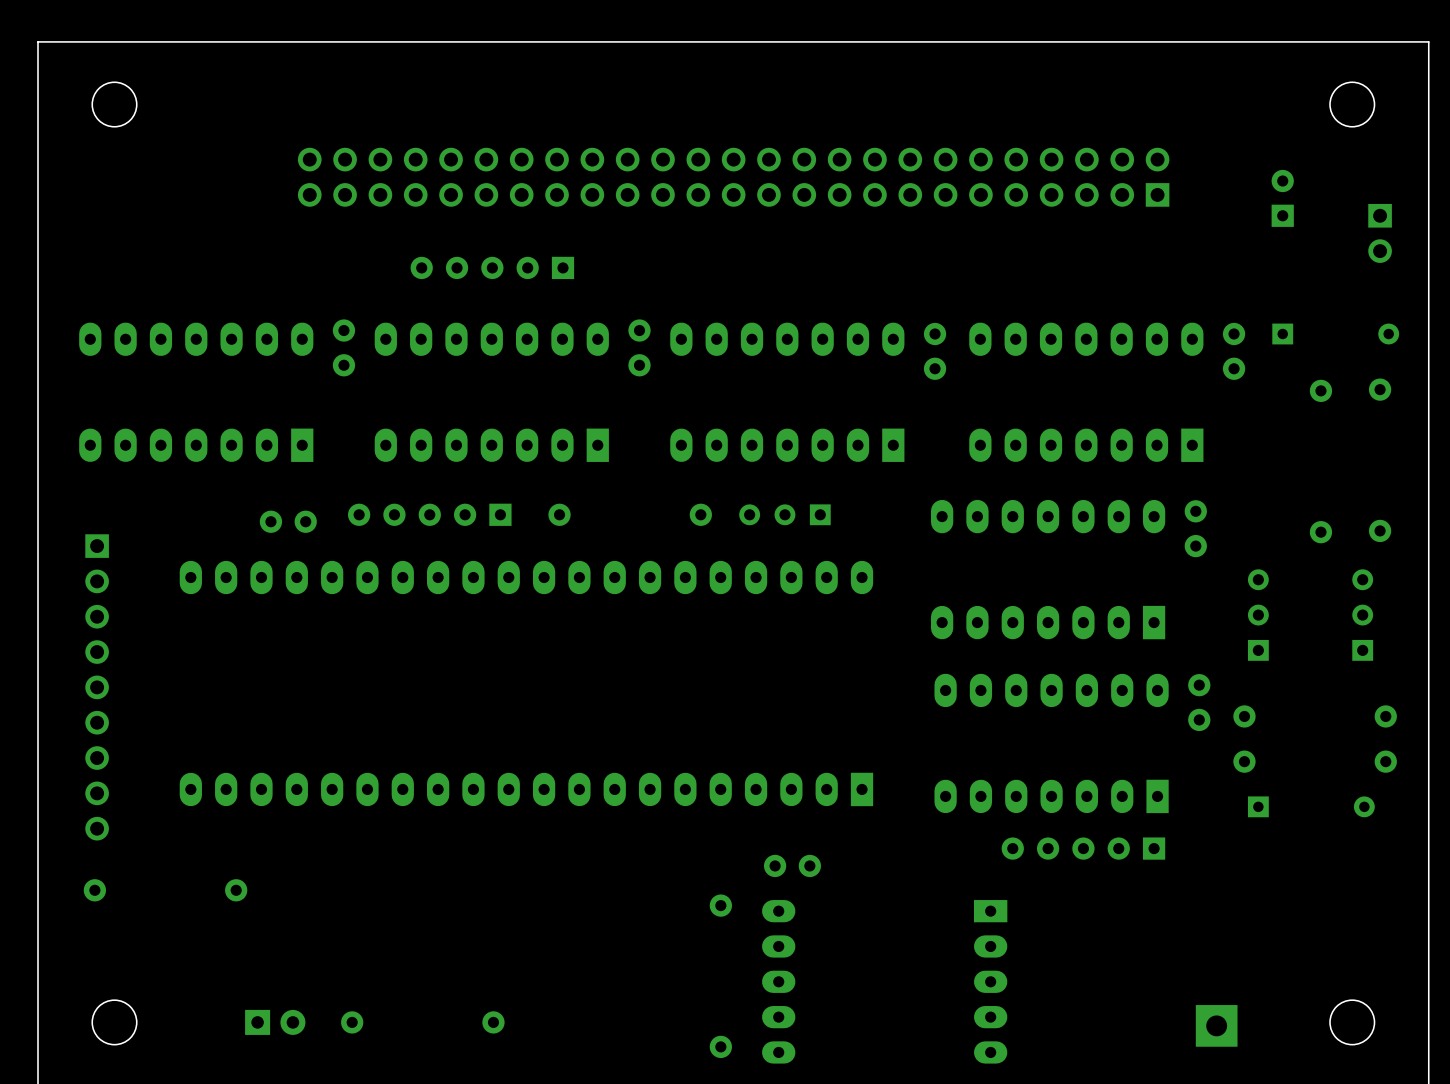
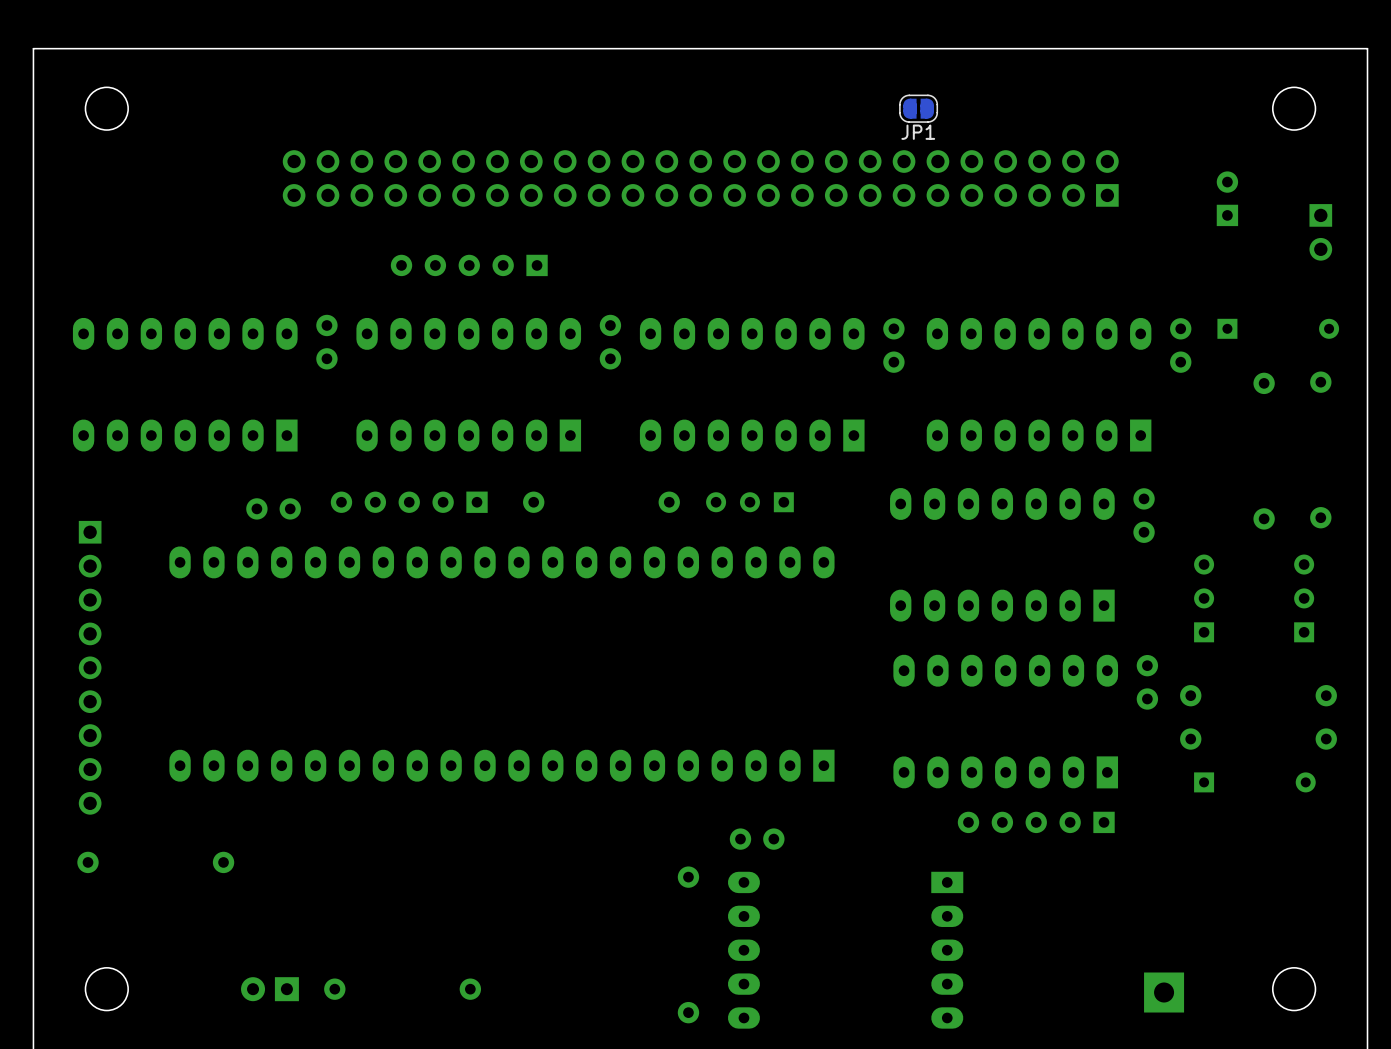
JP1: none -> (918, 108)
part rotation: 0° (275, 1022) -> 180° (269, 989)

